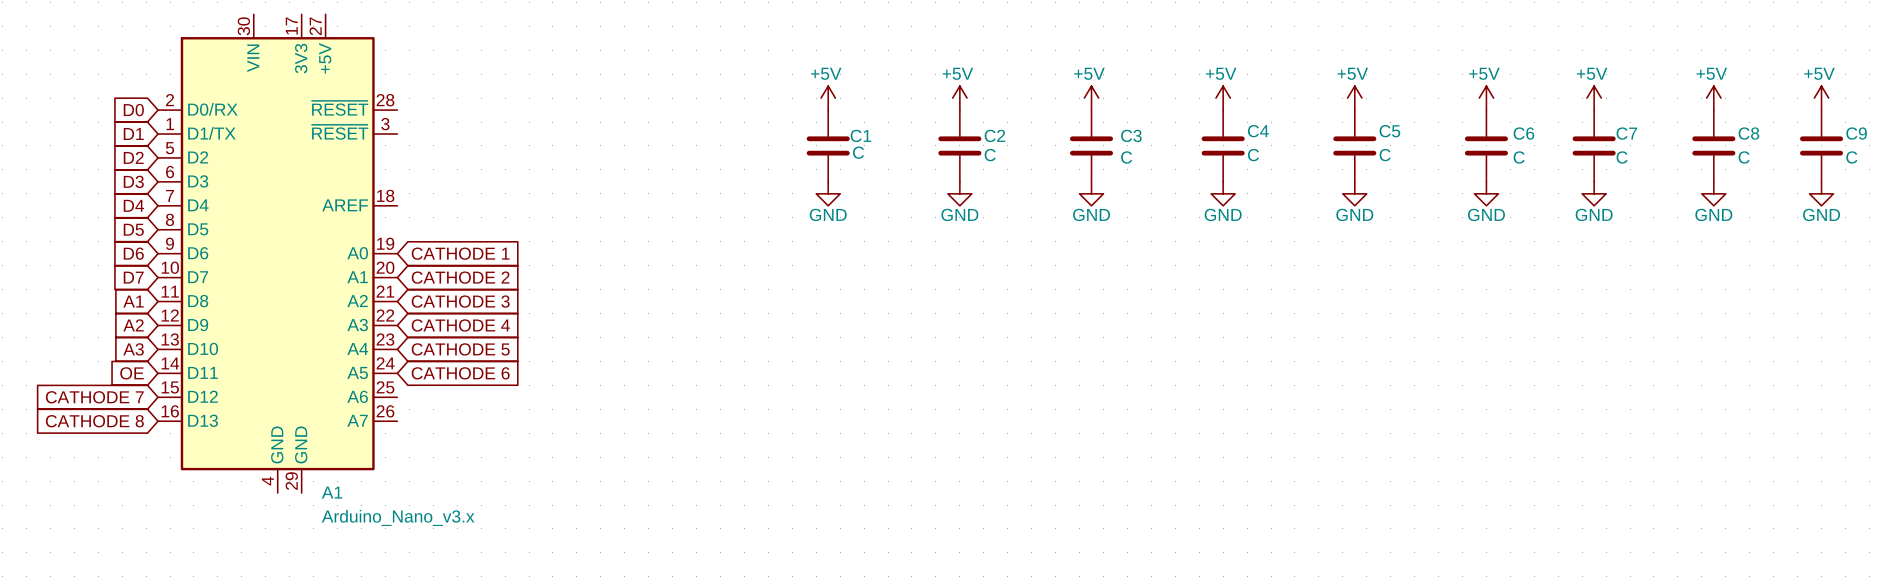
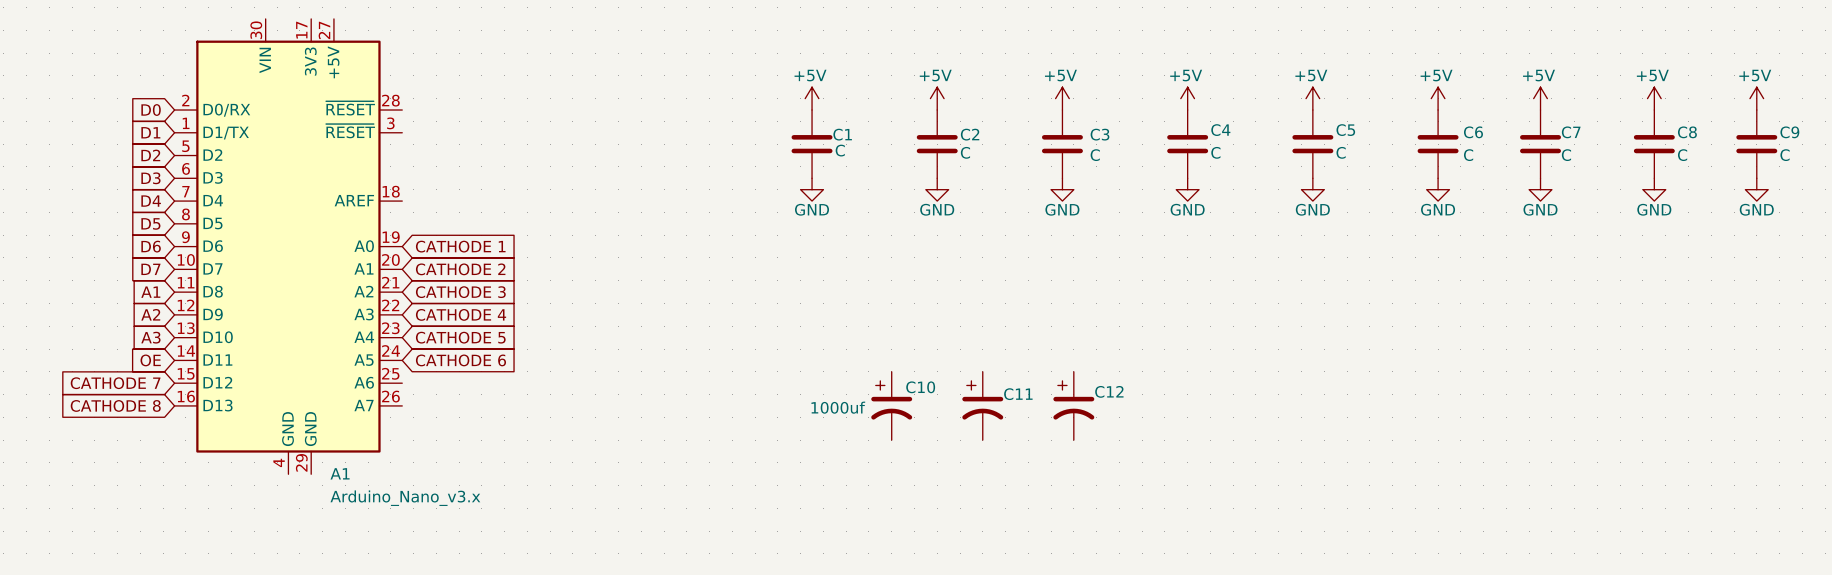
C10: none -> 1000uf (891, 405)
C11: none -> (982, 405)
C12: none -> (1073, 405)

